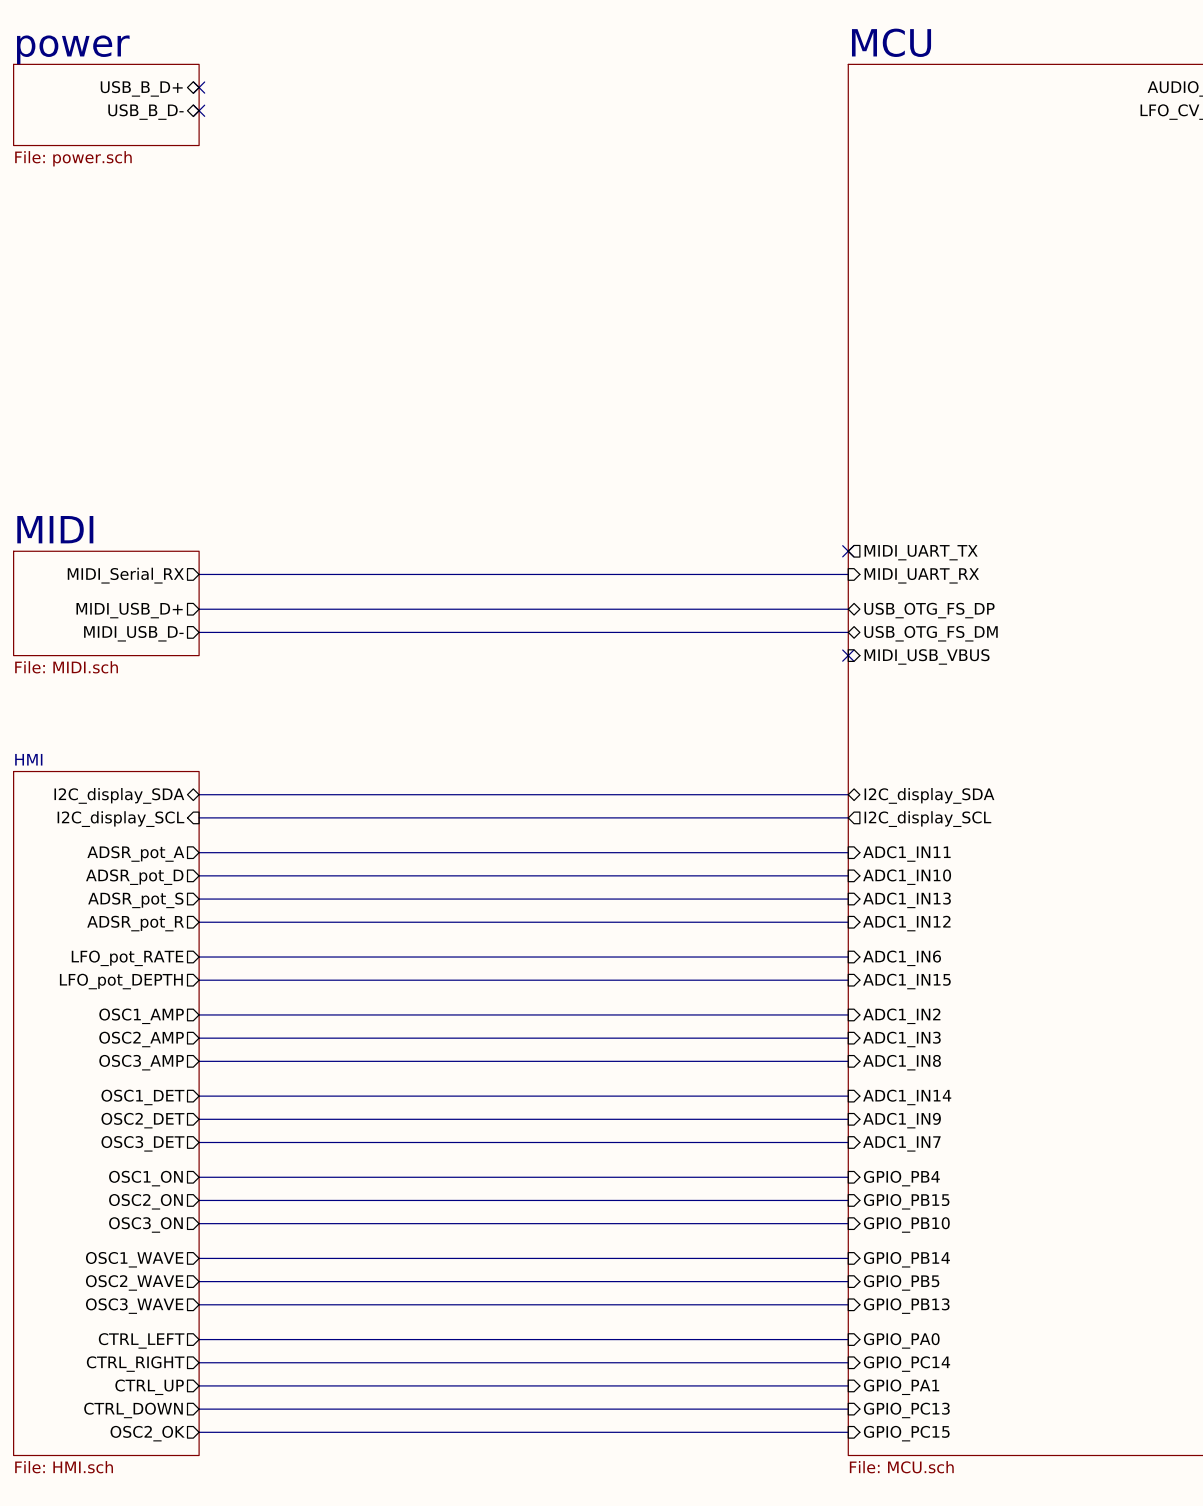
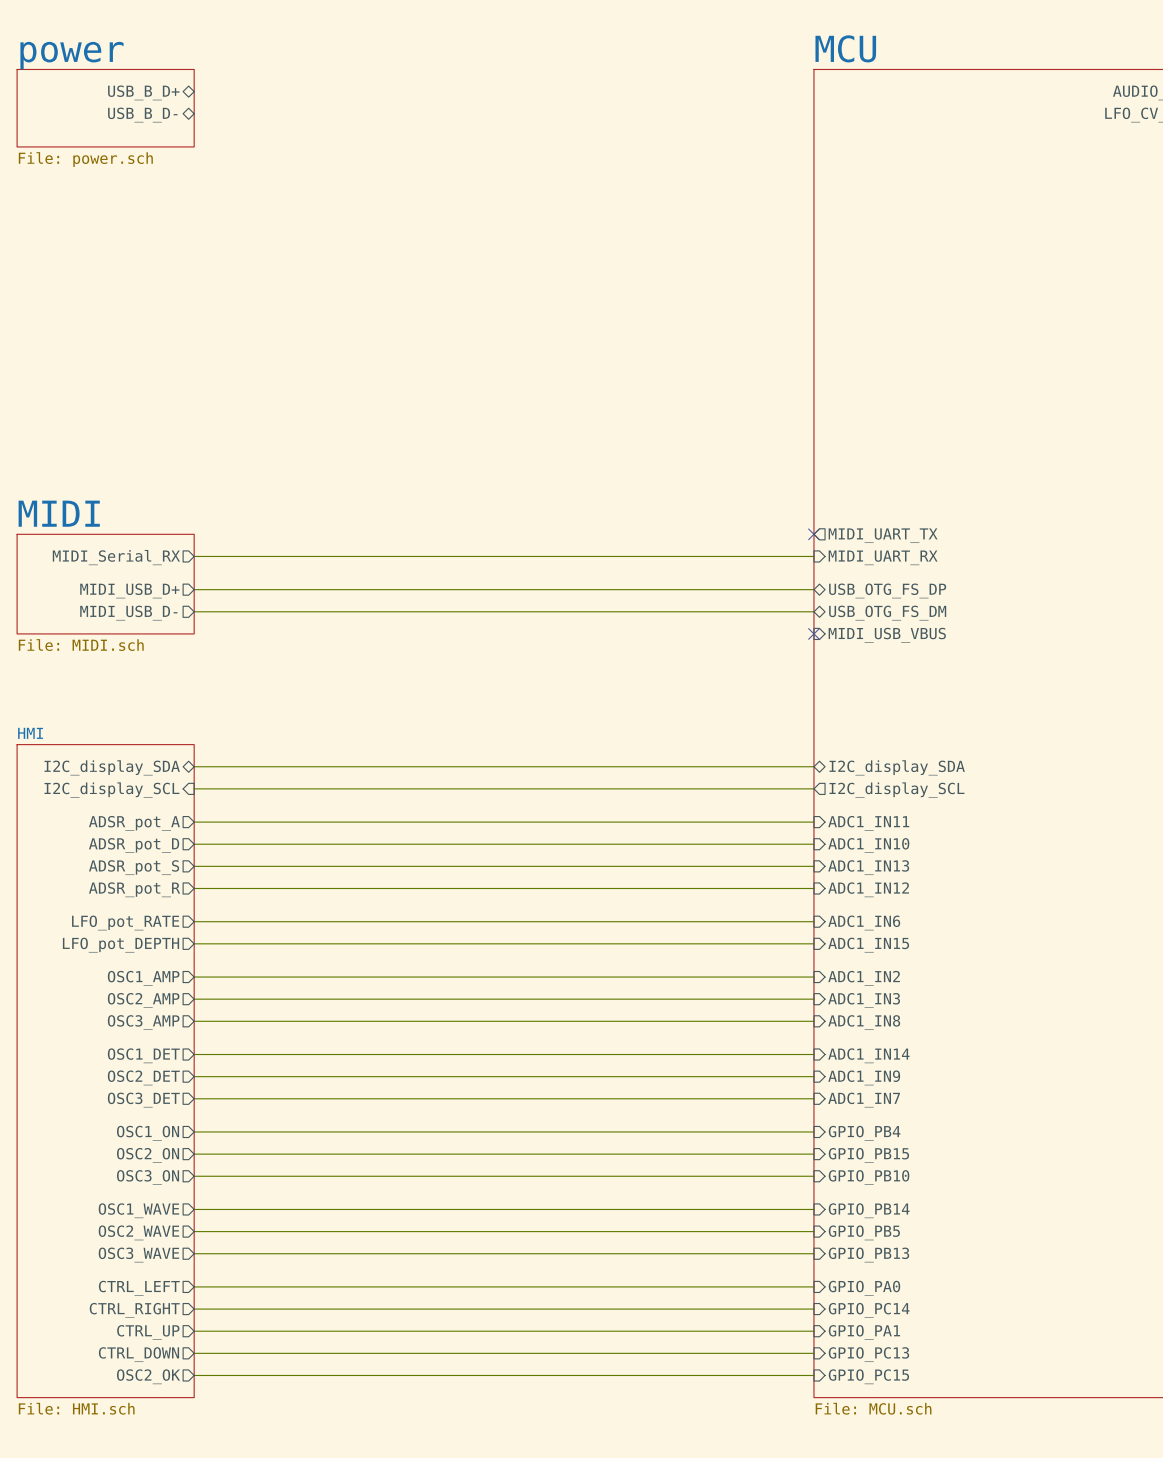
no-connect mark: (199, 87) -> none
no-connect mark: (199, 110) -> none

